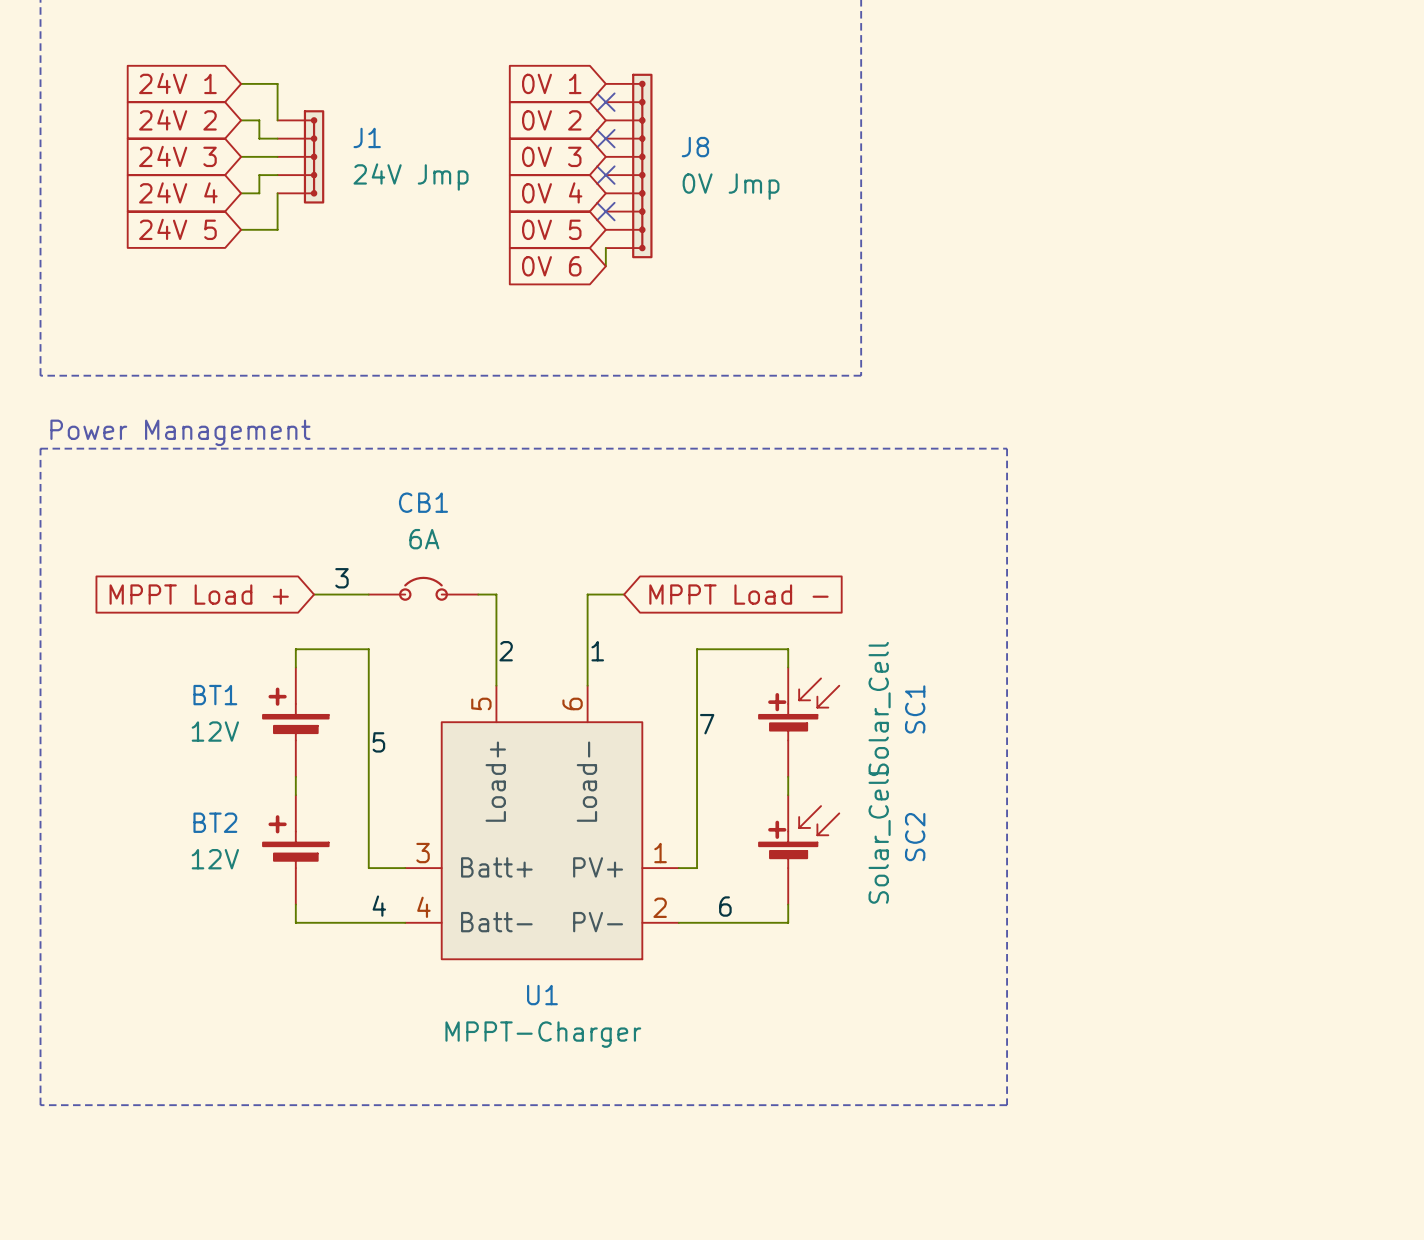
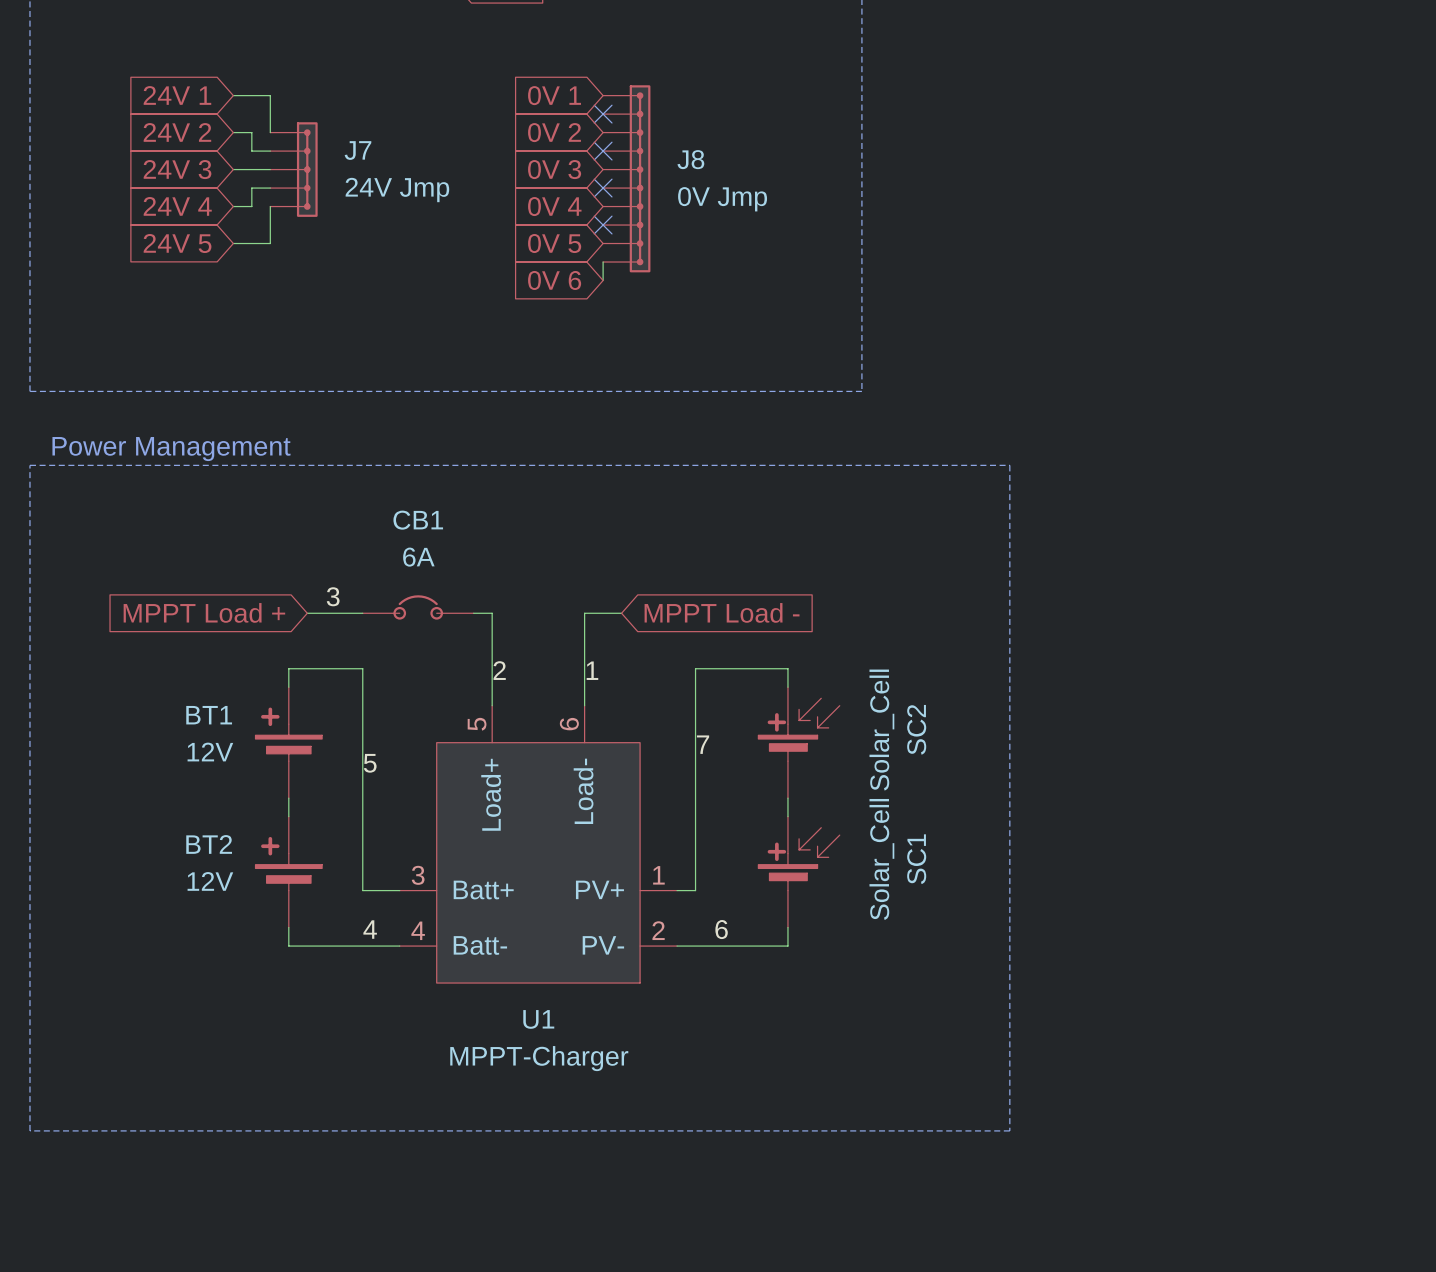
J1 name: J1 (367, 137) -> J7 (358, 150)
SC1 name: SC1 (915, 709) -> SC2 (916, 729)
SC2 name: SC2 (915, 837) -> SC1 (916, 859)

